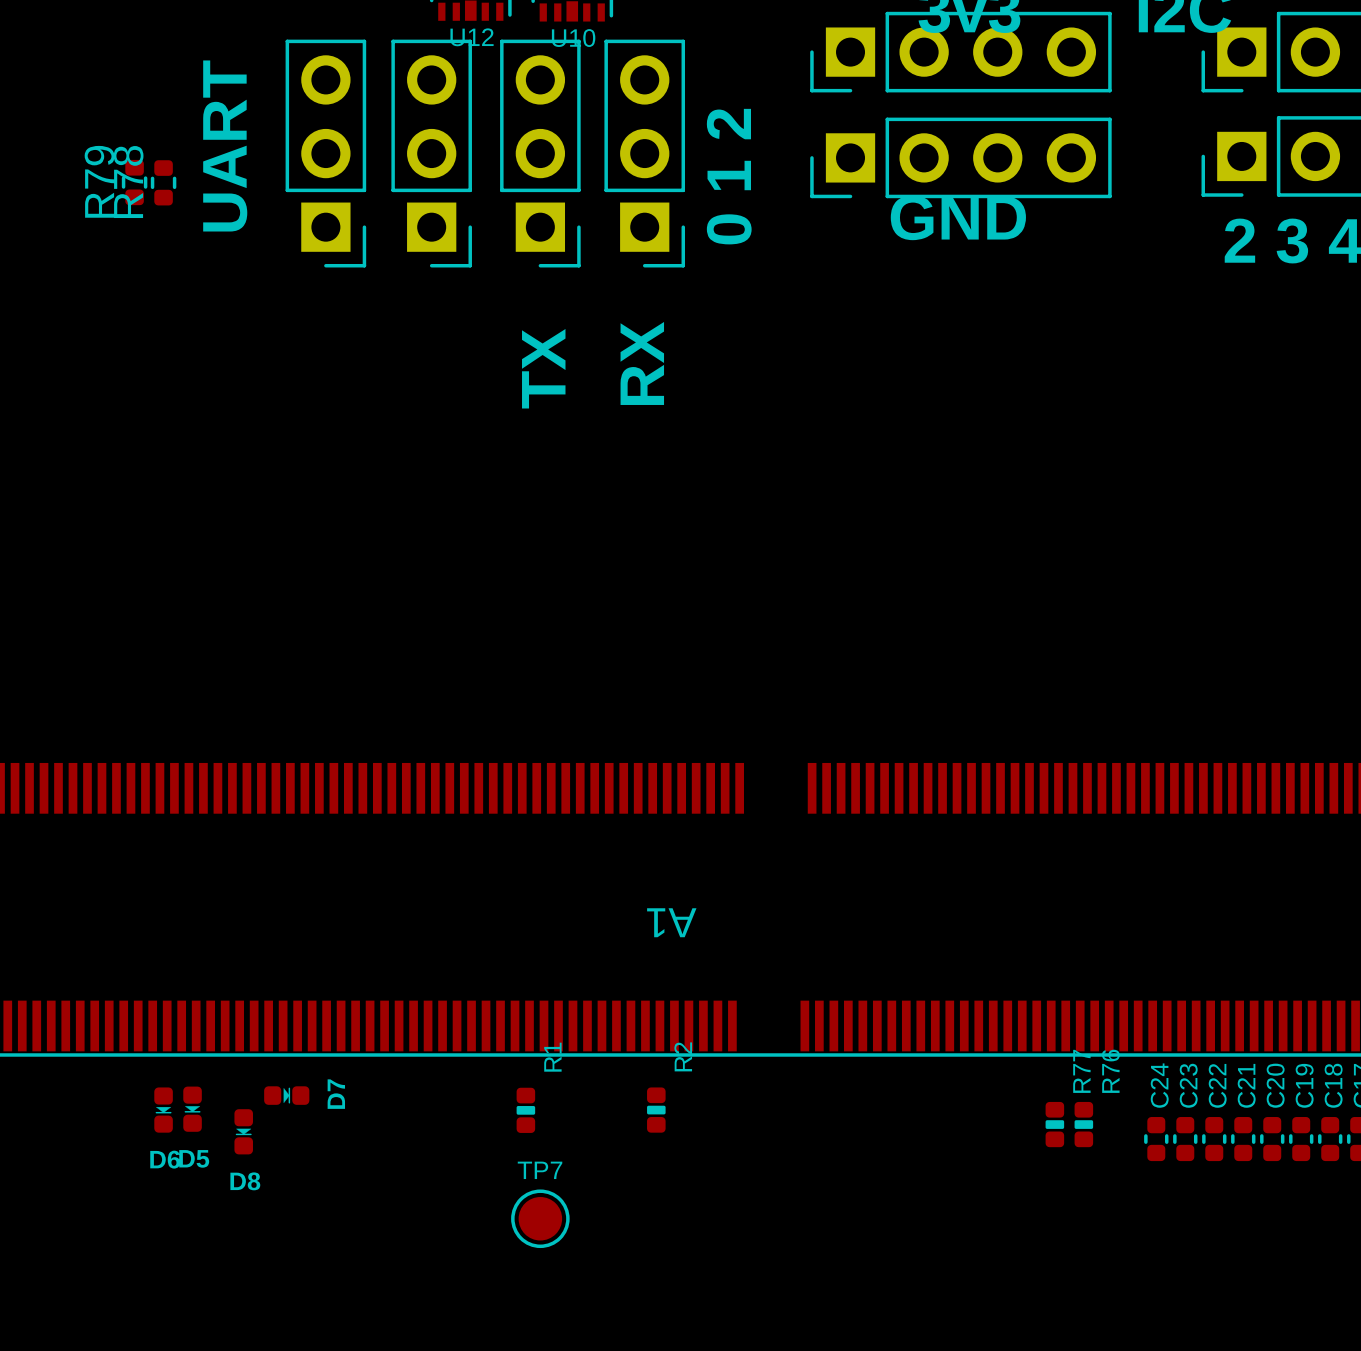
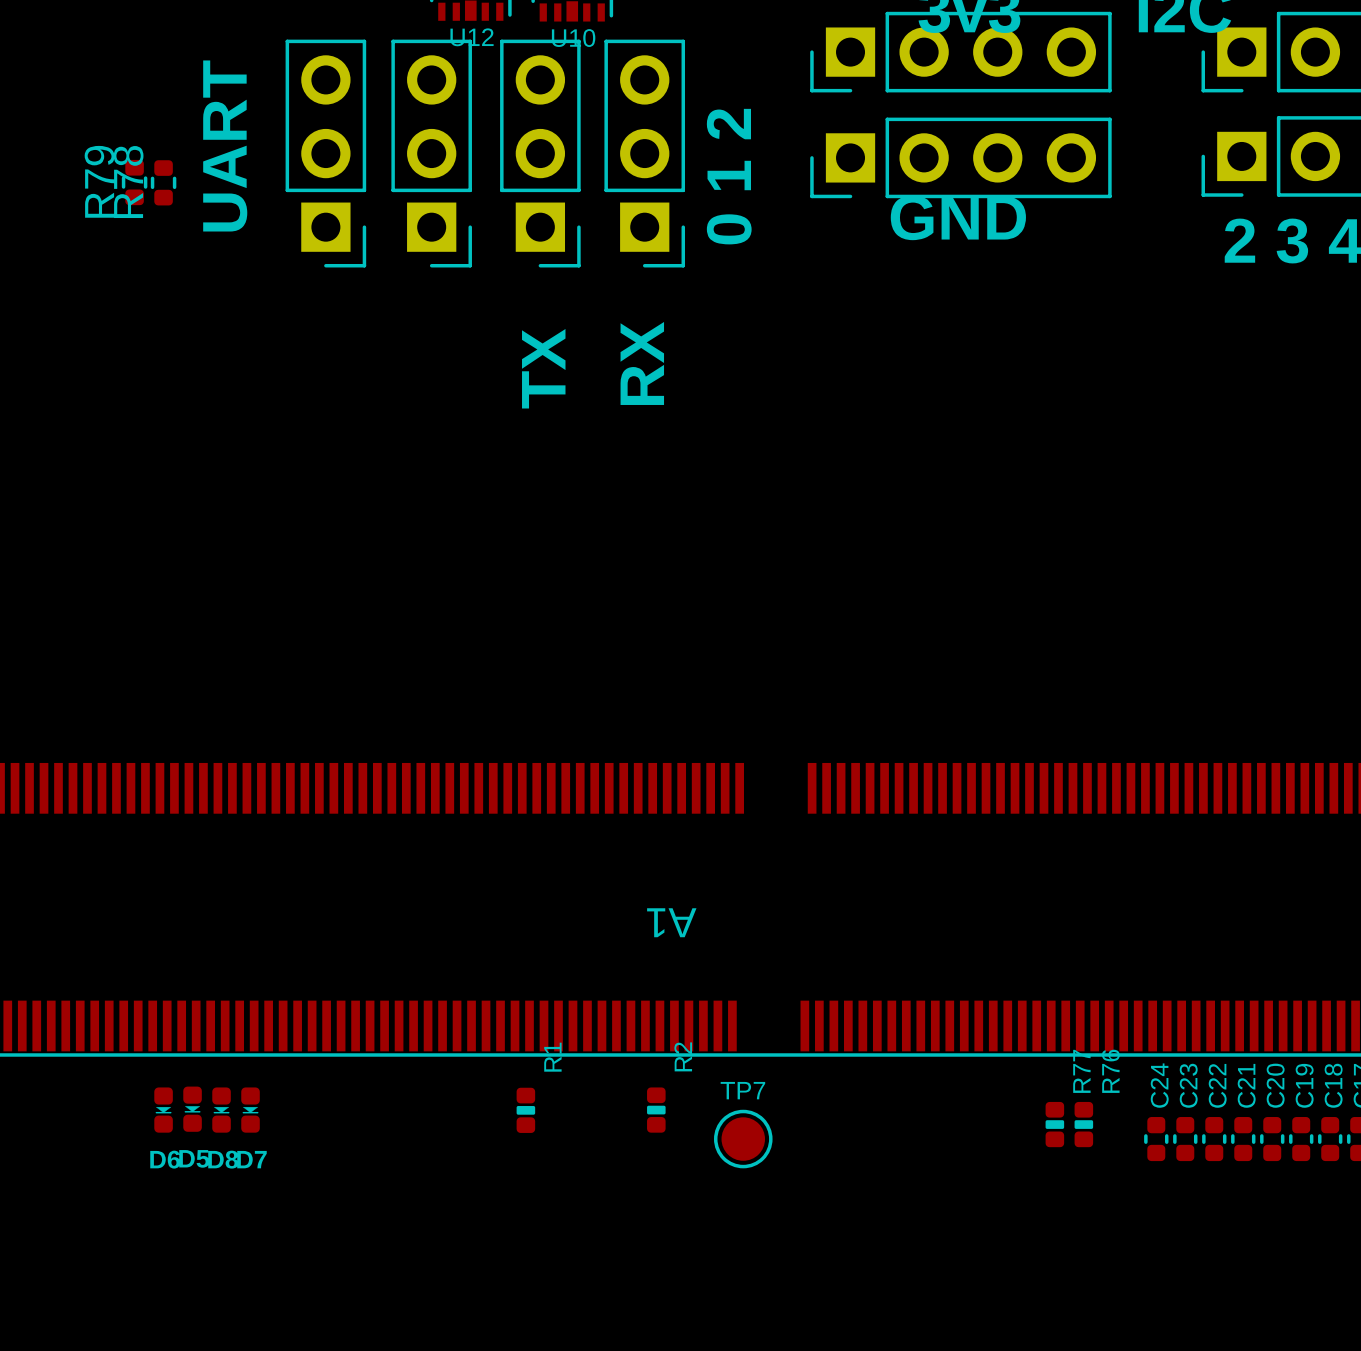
D7 rotation: 0° (286, 1095) -> 90° clockwise (250, 1110)
D7 position: (286, 1095) -> (250, 1110)
D8 position: (243, 1131) -> (221, 1110)
TP7 position: (540, 1218) -> (743, 1139)

